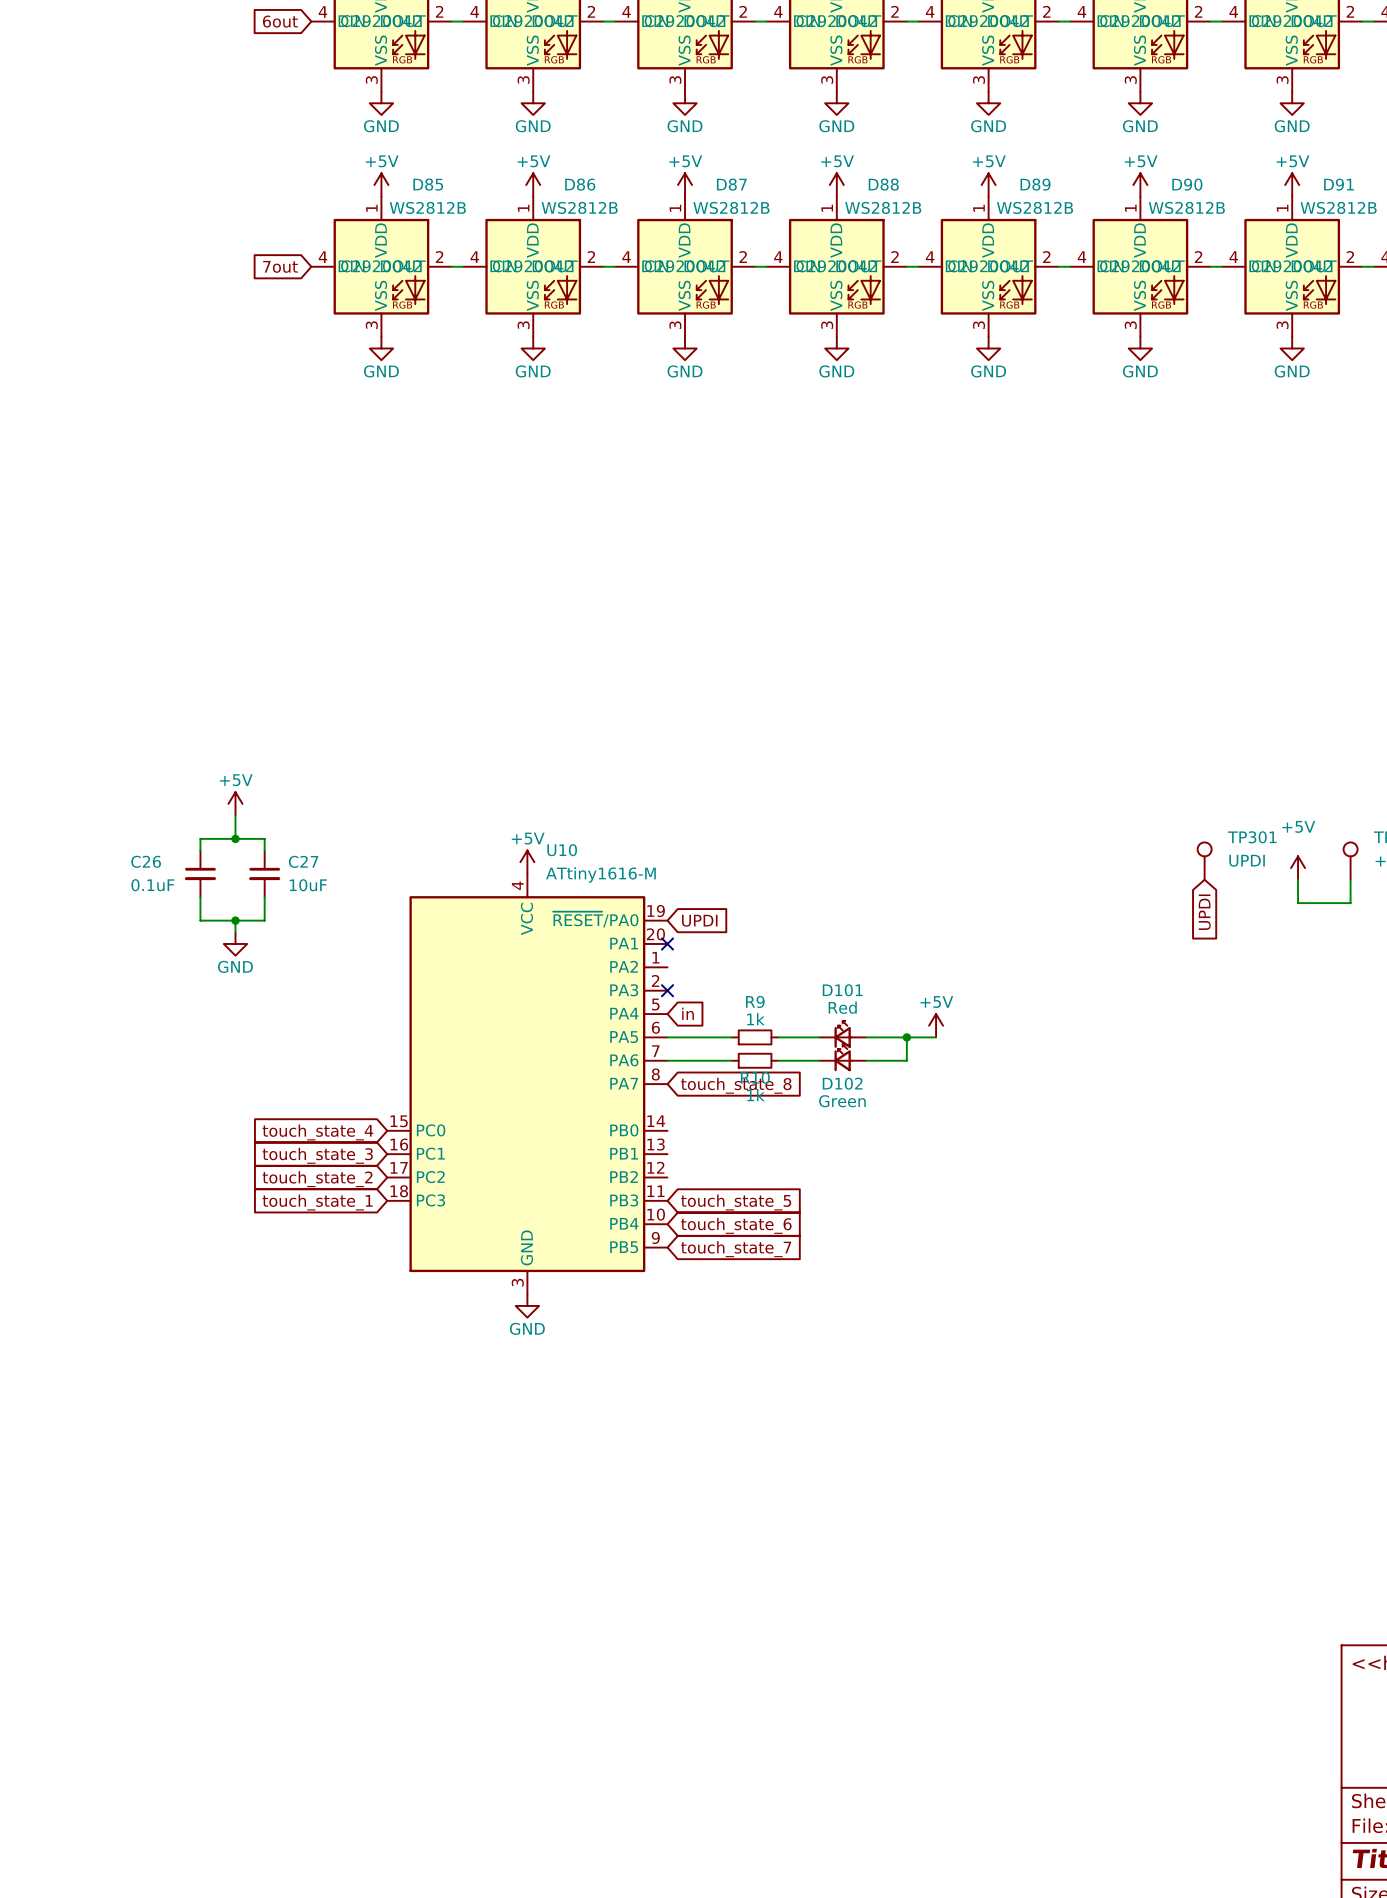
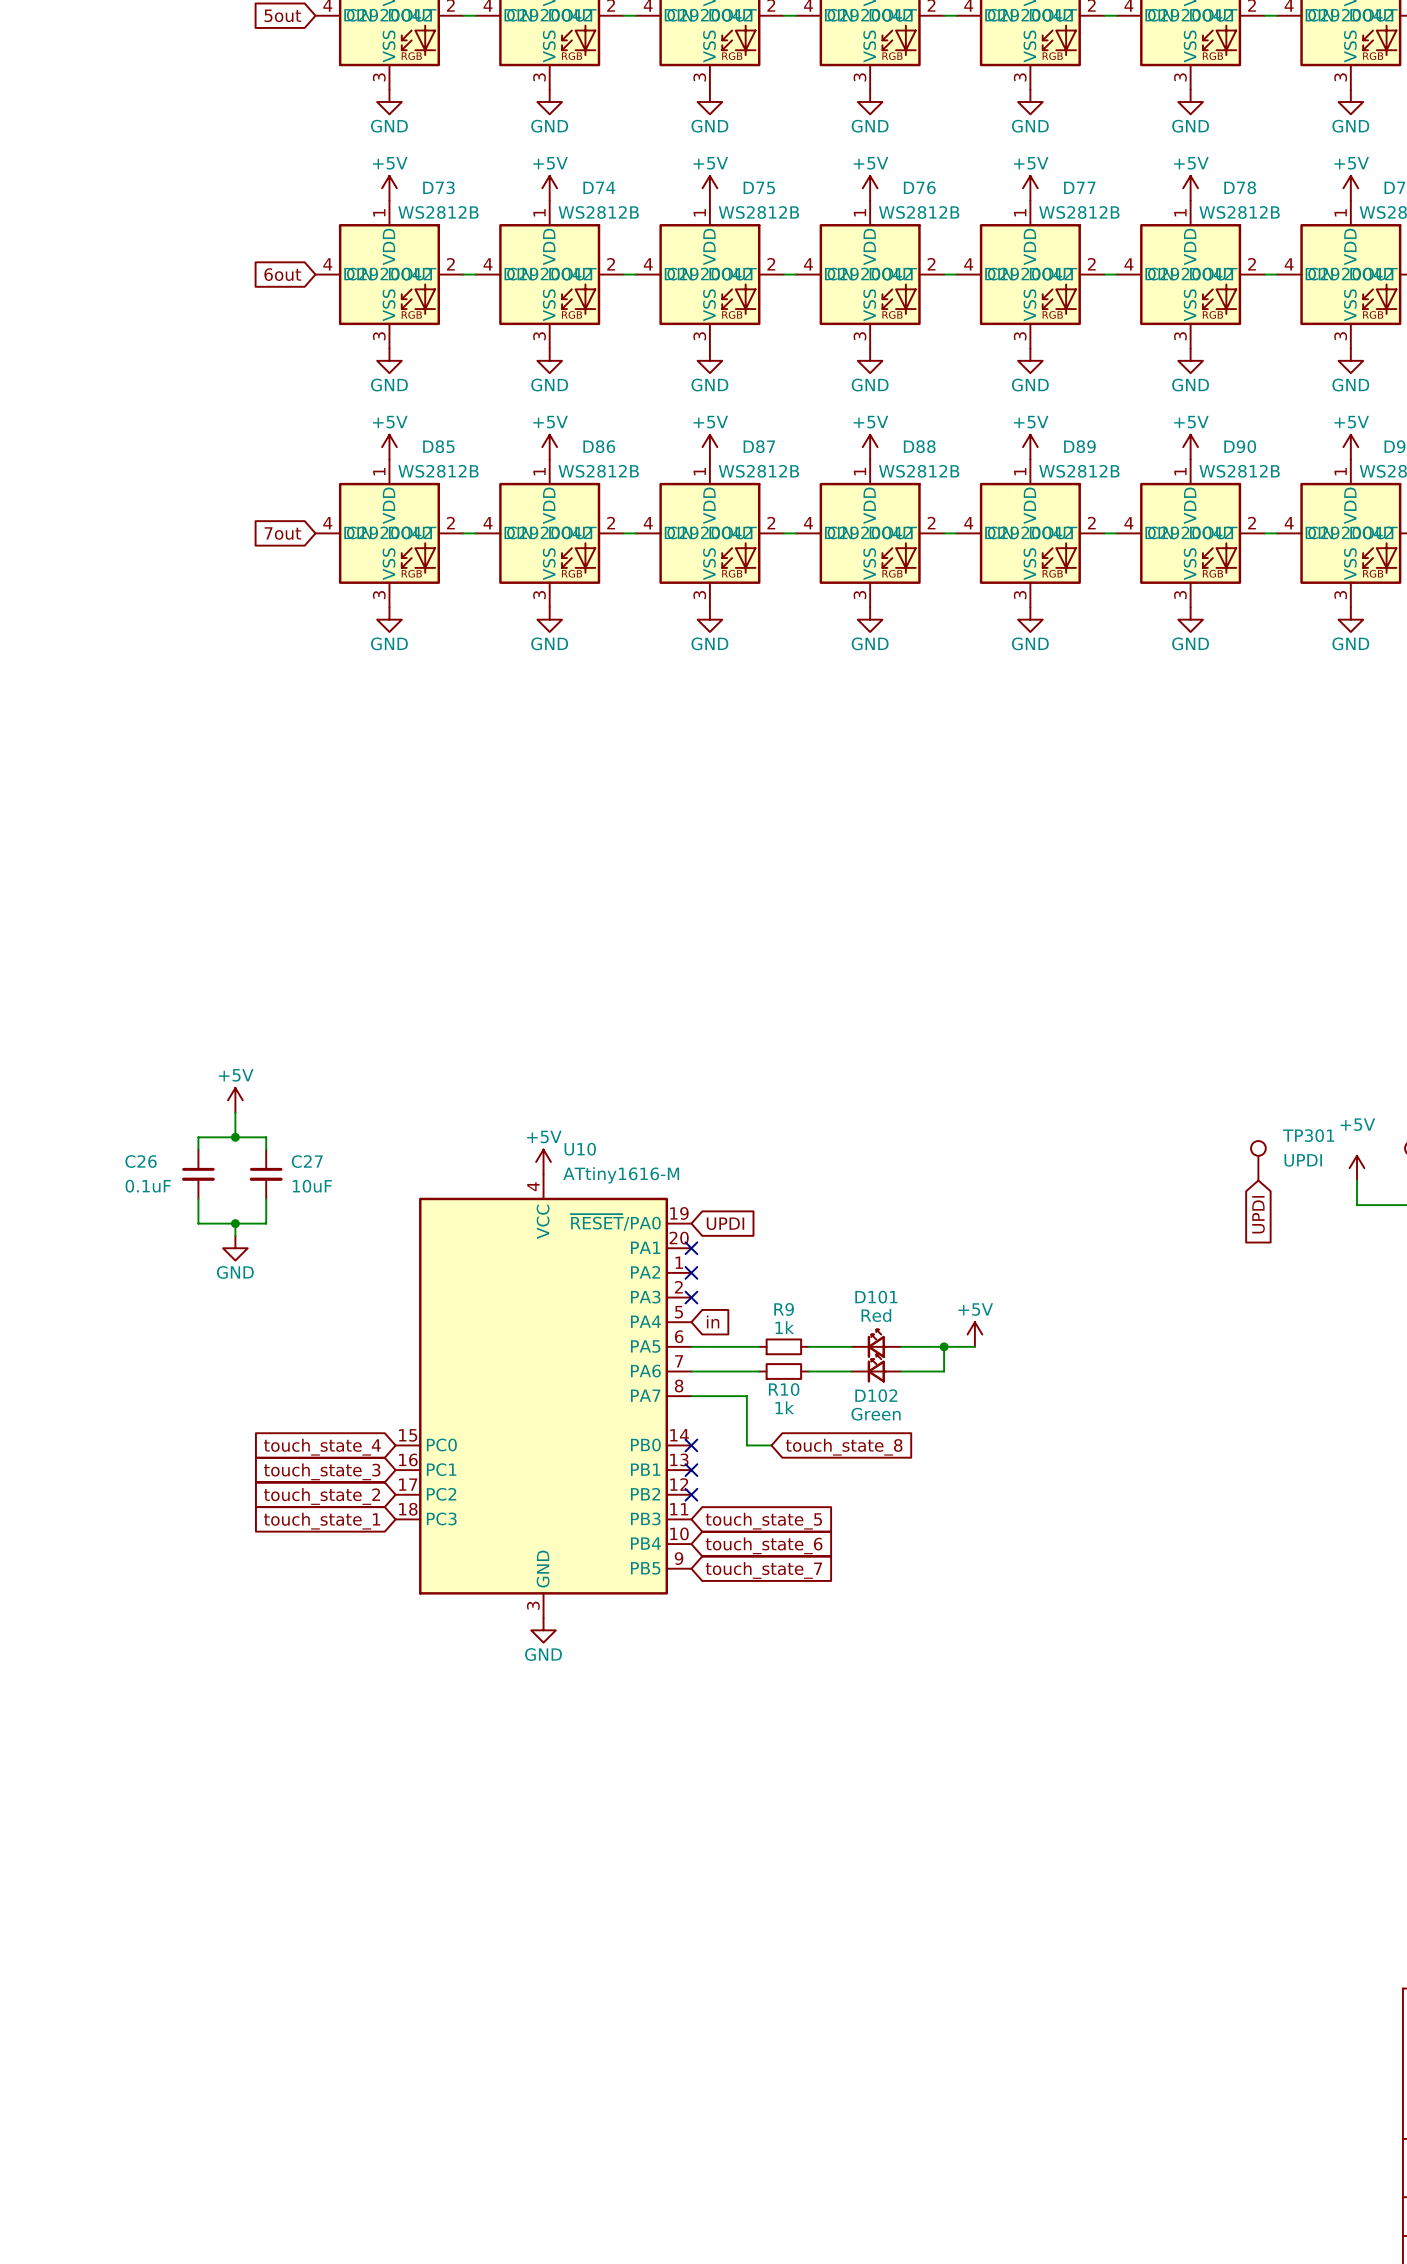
no-connect mark: none -> (691, 1272)
wire: none -> (691, 1396) (746, 1396) (746, 1445) (771, 1445)
global label position: touch_state_8 (736, 1085) -> touch_state_8 (844, 1447)
no-connect mark: none -> (691, 1445)
no-connect mark: none -> (691, 1470)
no-connect mark: none -> (691, 1494)

